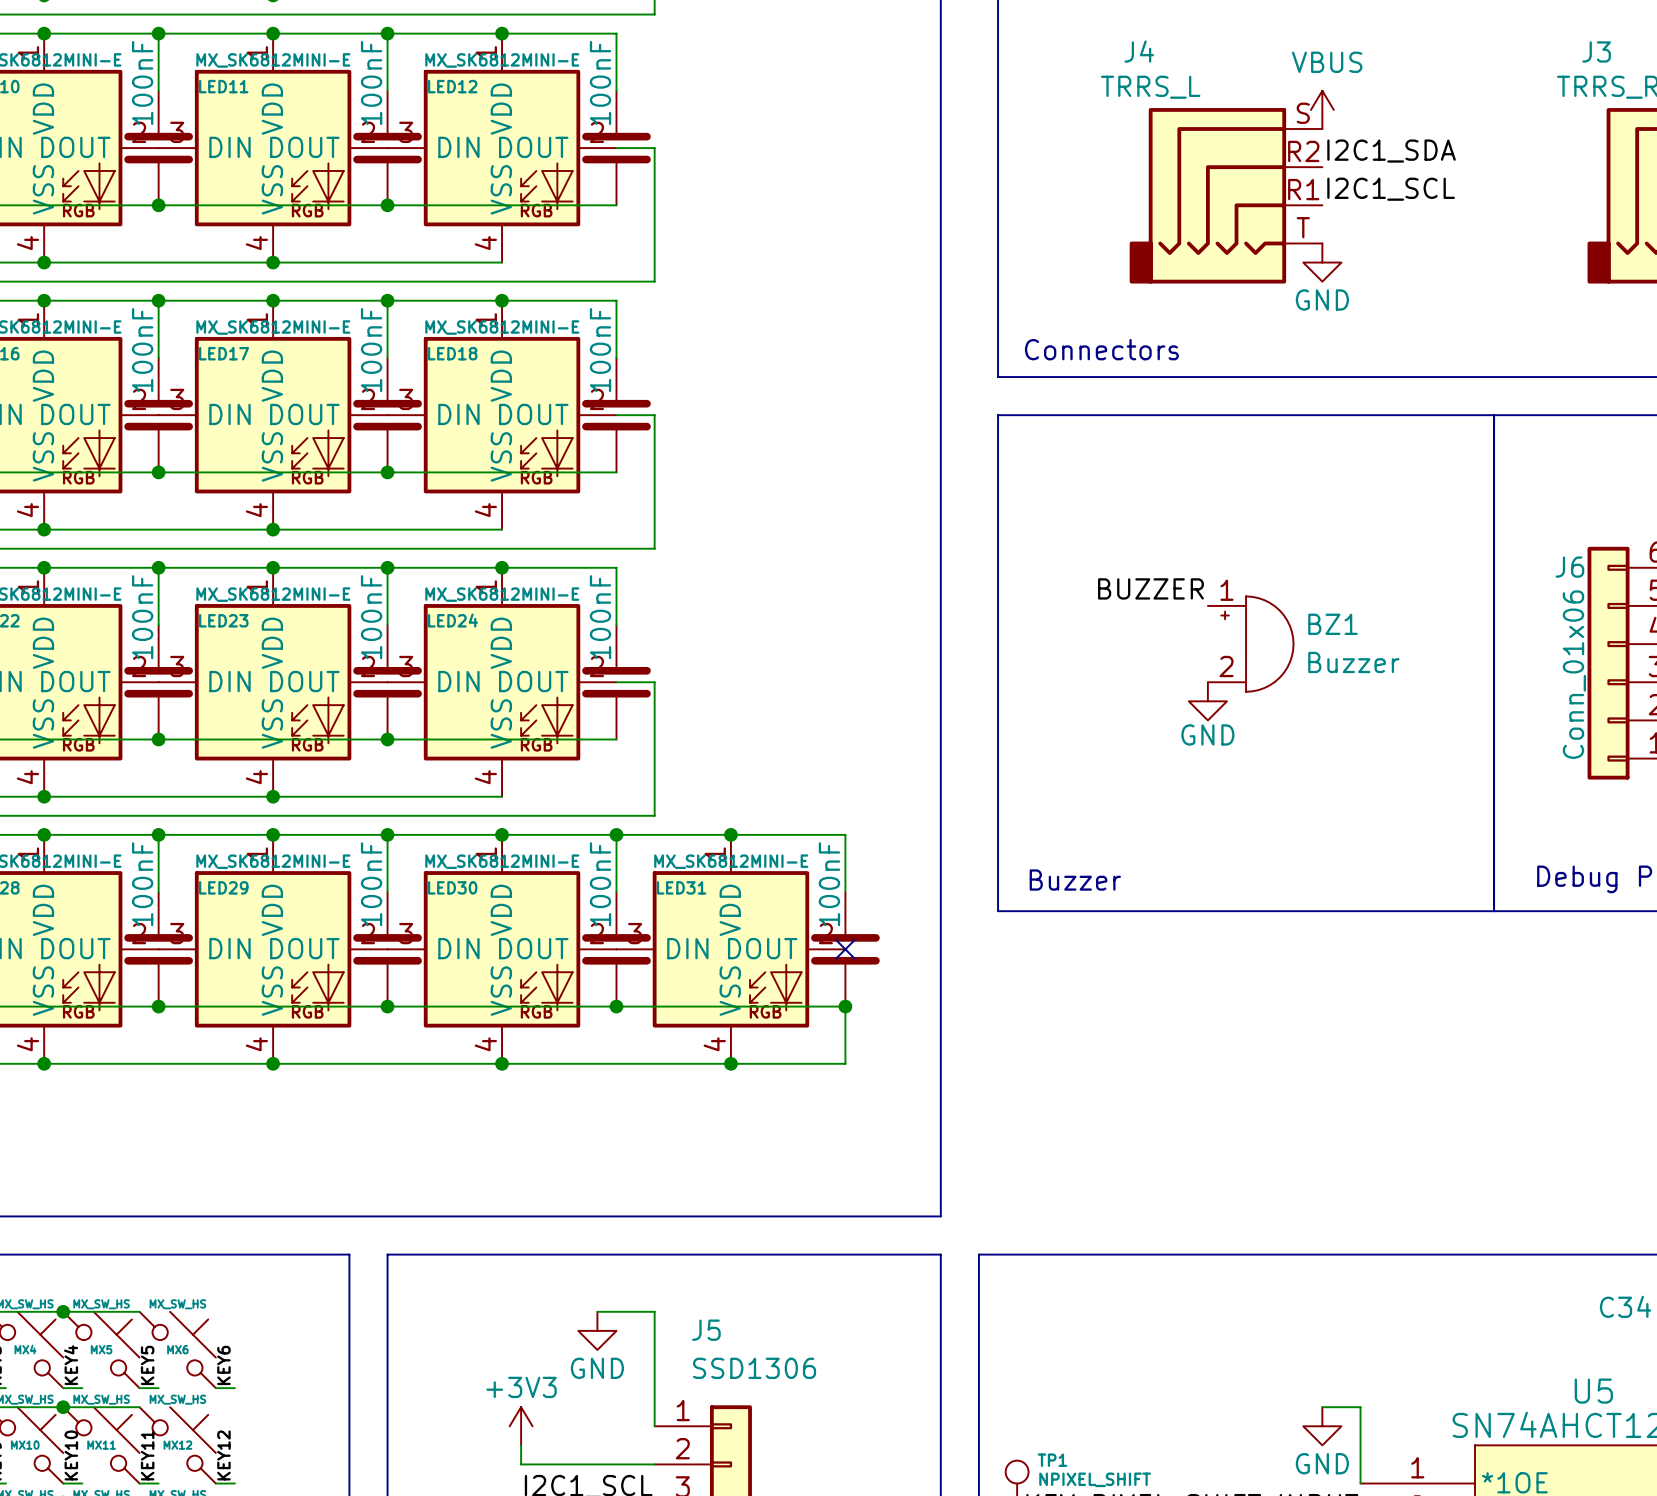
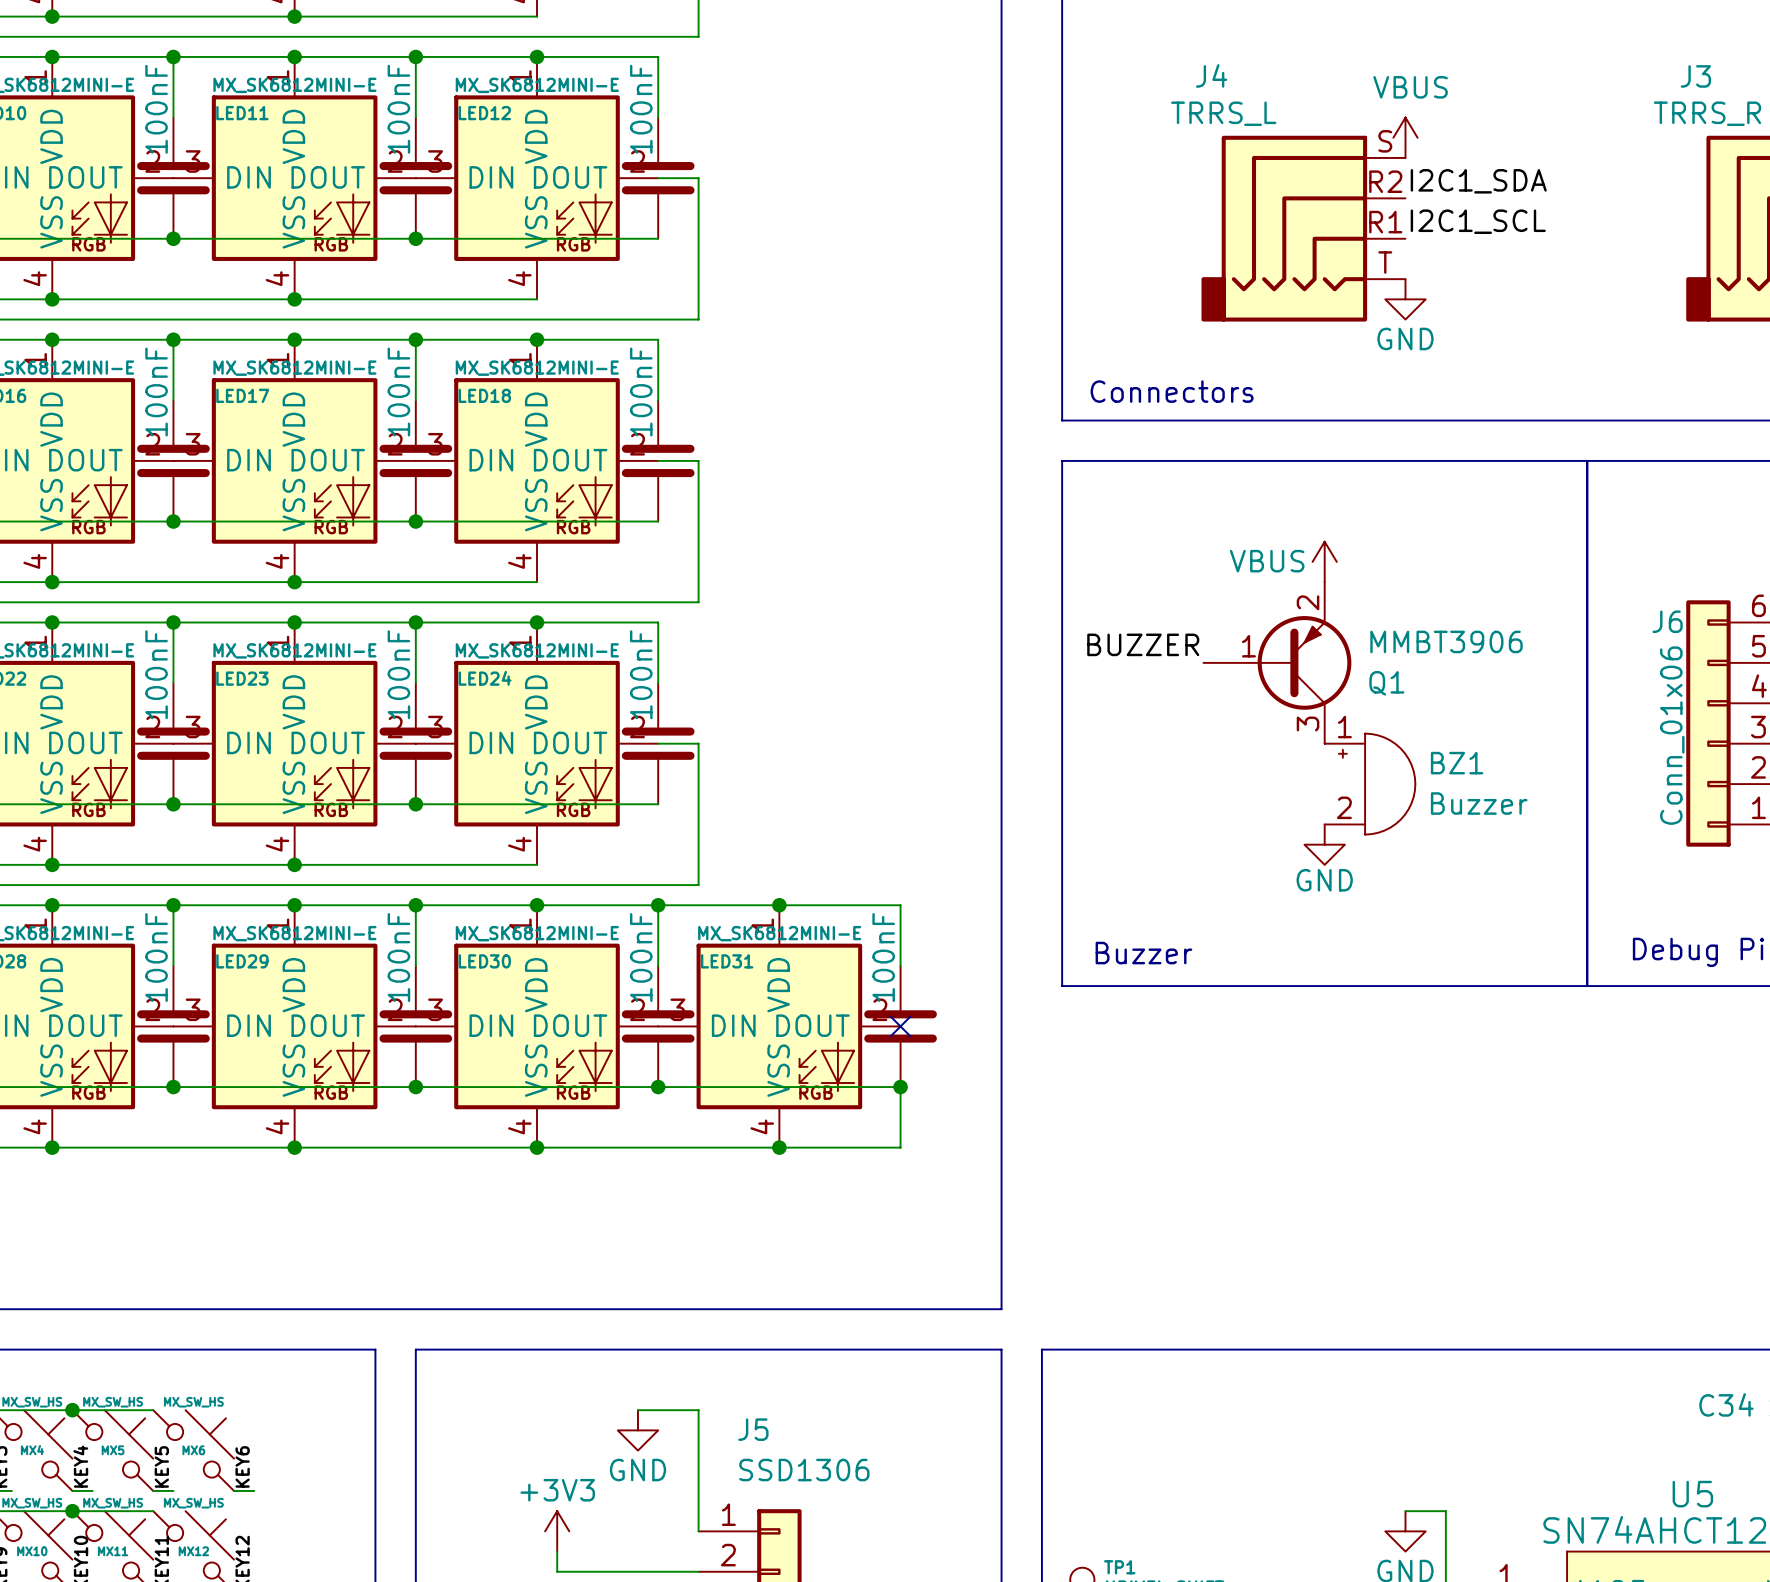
power symbol: none -> VBUS (1324, 561)
label position: BUZZER (1150, 588) -> BUZZER (1143, 644)
Q1: none -> MMBT3906 (1277, 662)
BZ1 position: (1250, 644) -> (1370, 784)
power symbol position: GND (1207, 701) -> GND (1324, 844)

